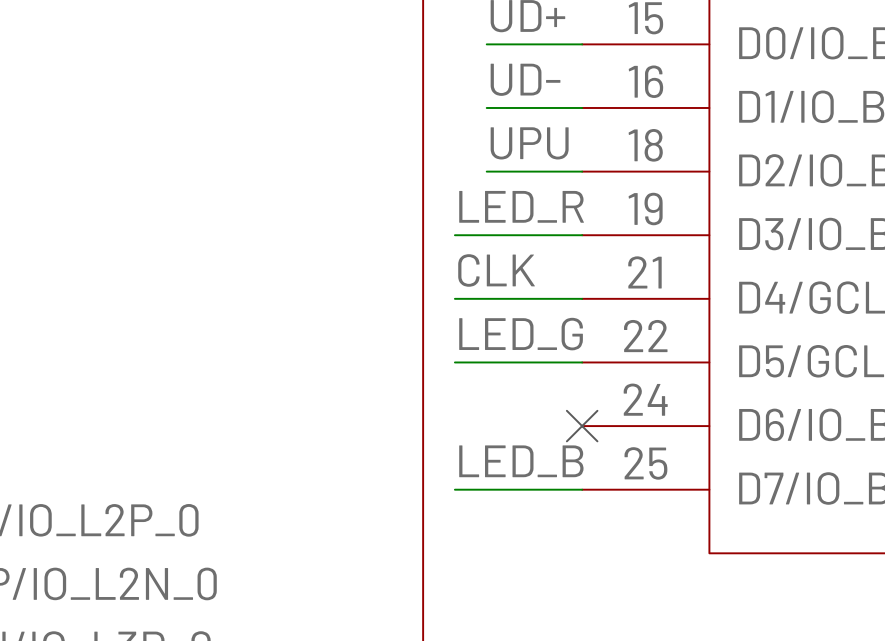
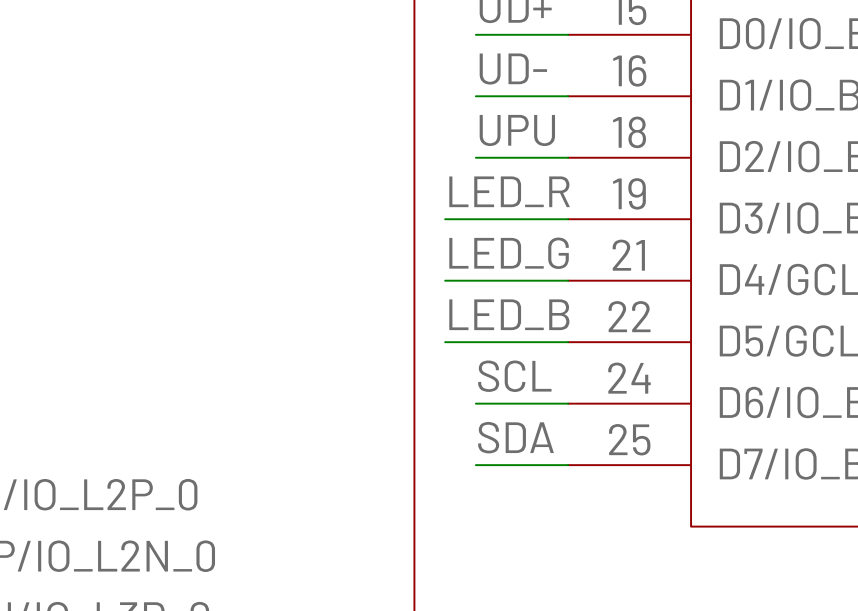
label: CLK (496, 270) -> LED_G (509, 253)
label: LED_G (521, 334) -> LED_B (509, 314)
label: none -> SCL (514, 376)
wire: none -> (475, 403) (568, 403)
no-connect mark: (582, 426) -> none
label: LED_B (521, 461) -> none
label: none -> SDA (515, 437)
wire: (454, 489) (486, 489) -> none

